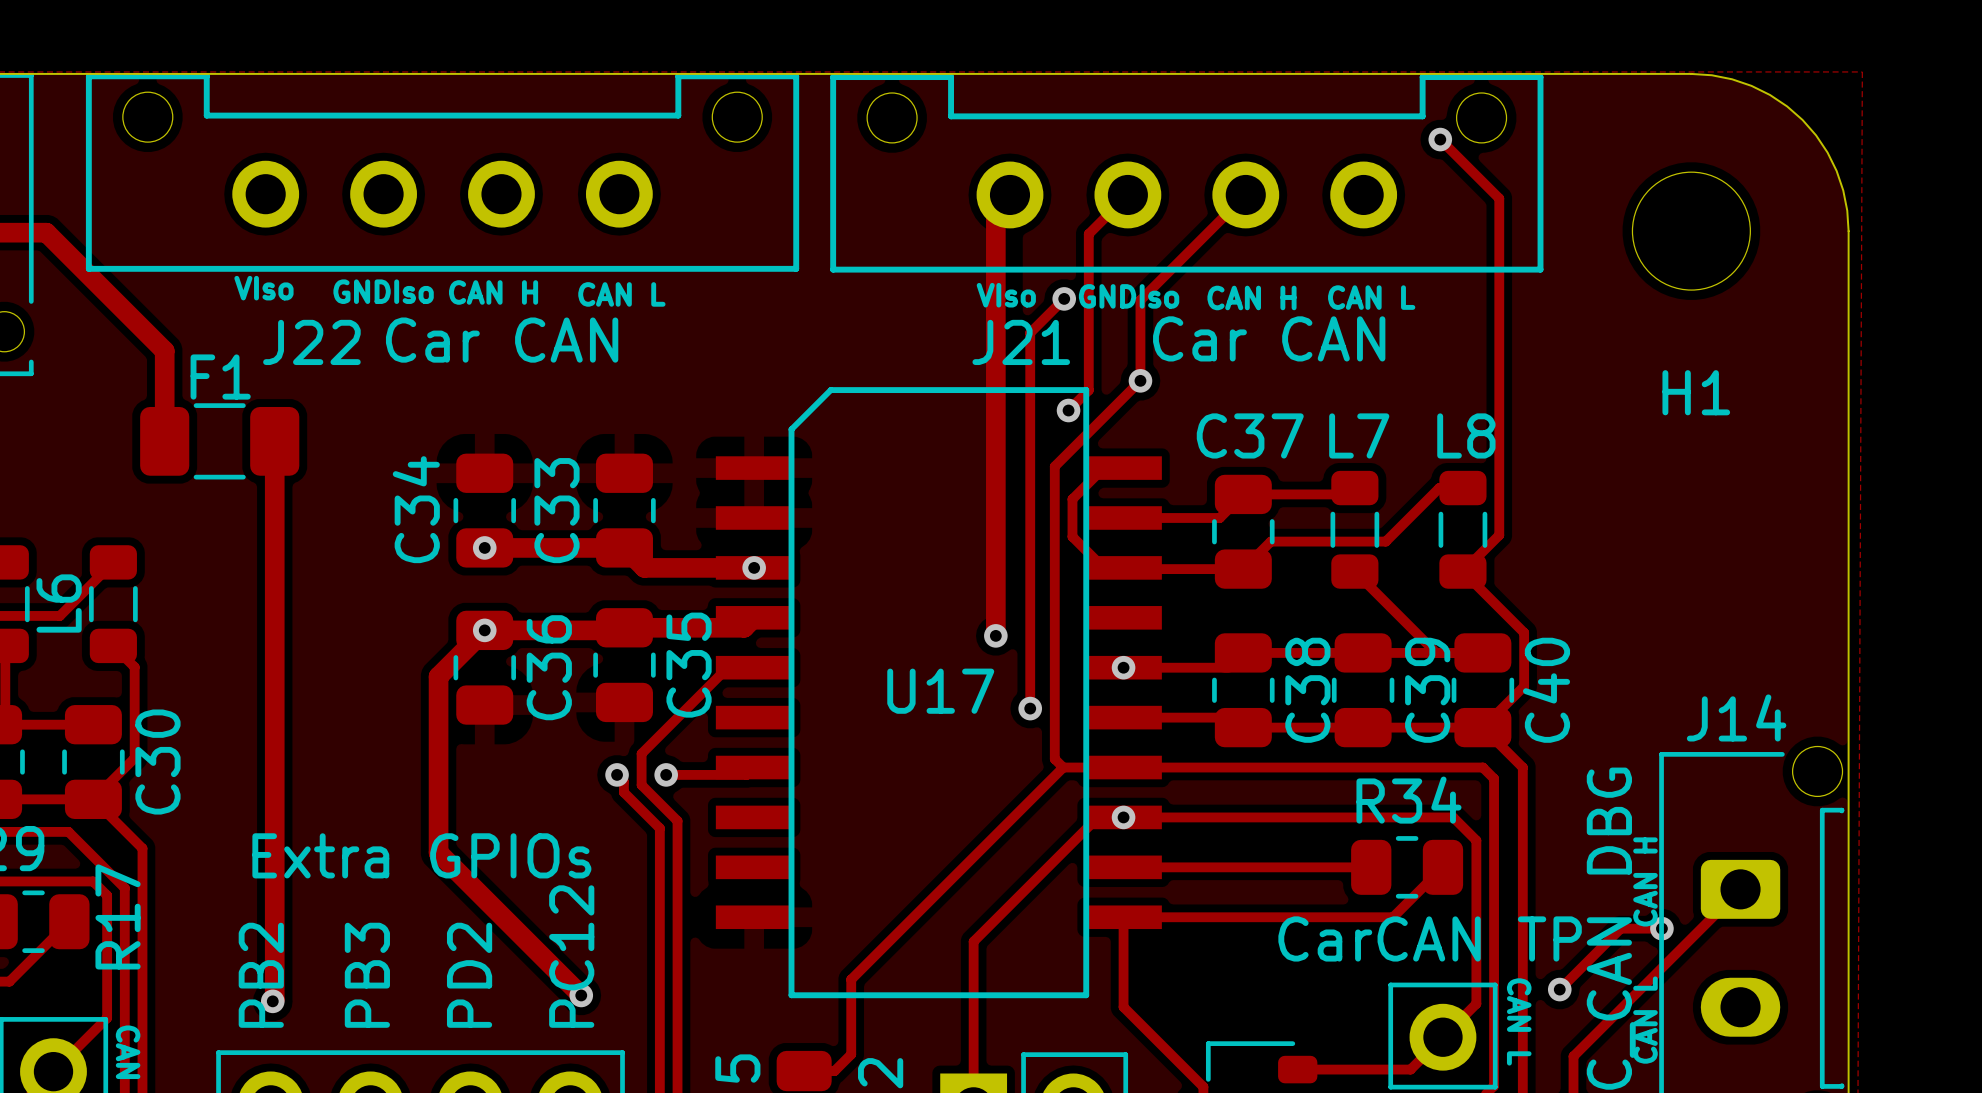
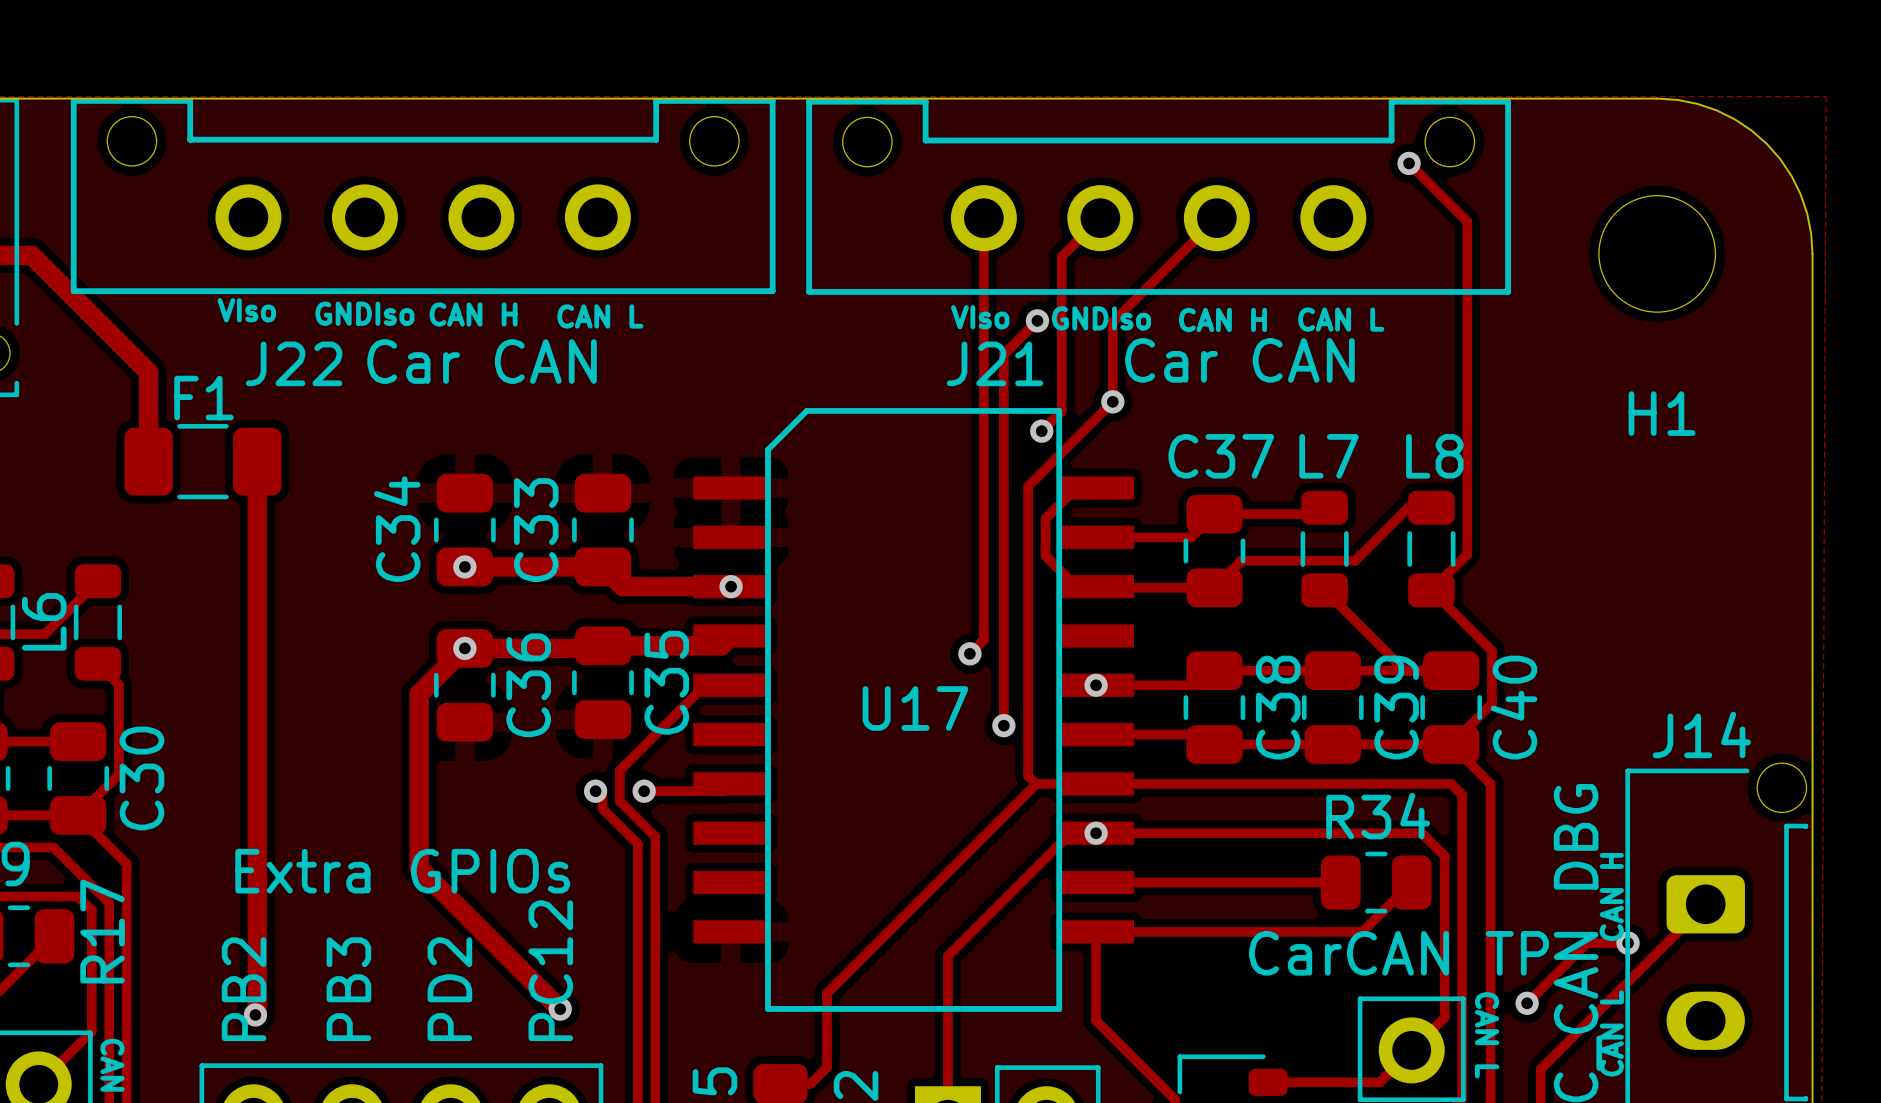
track: (1009, 194) (995, 209) (995, 635) -> (983, 218) (983, 639) (969, 653)

